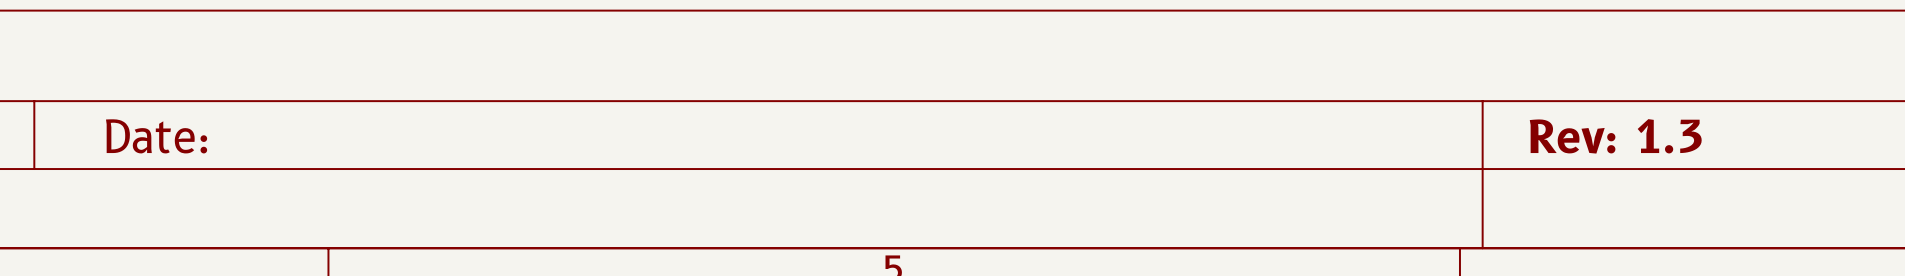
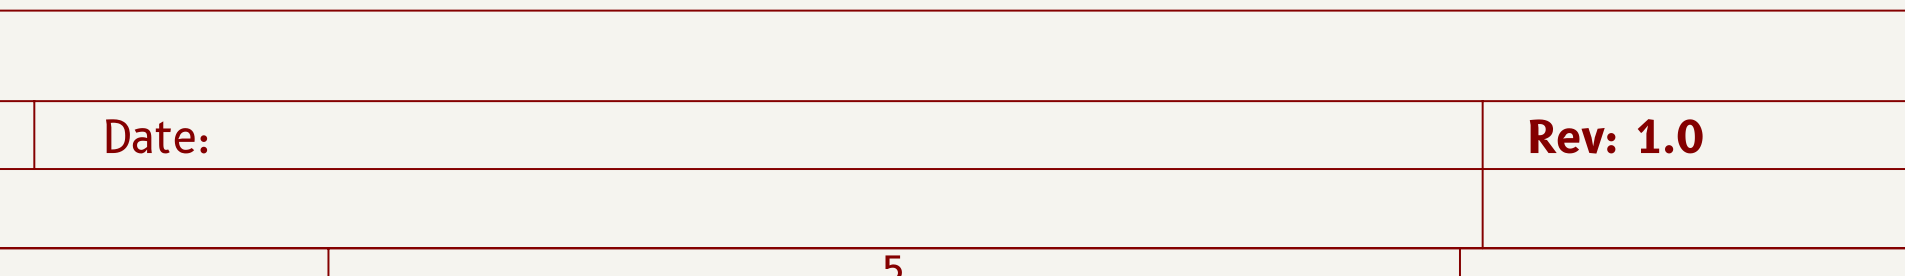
title block: Rev: 1.3 (1615, 136) -> Rev: 1.0 (1616, 136)

